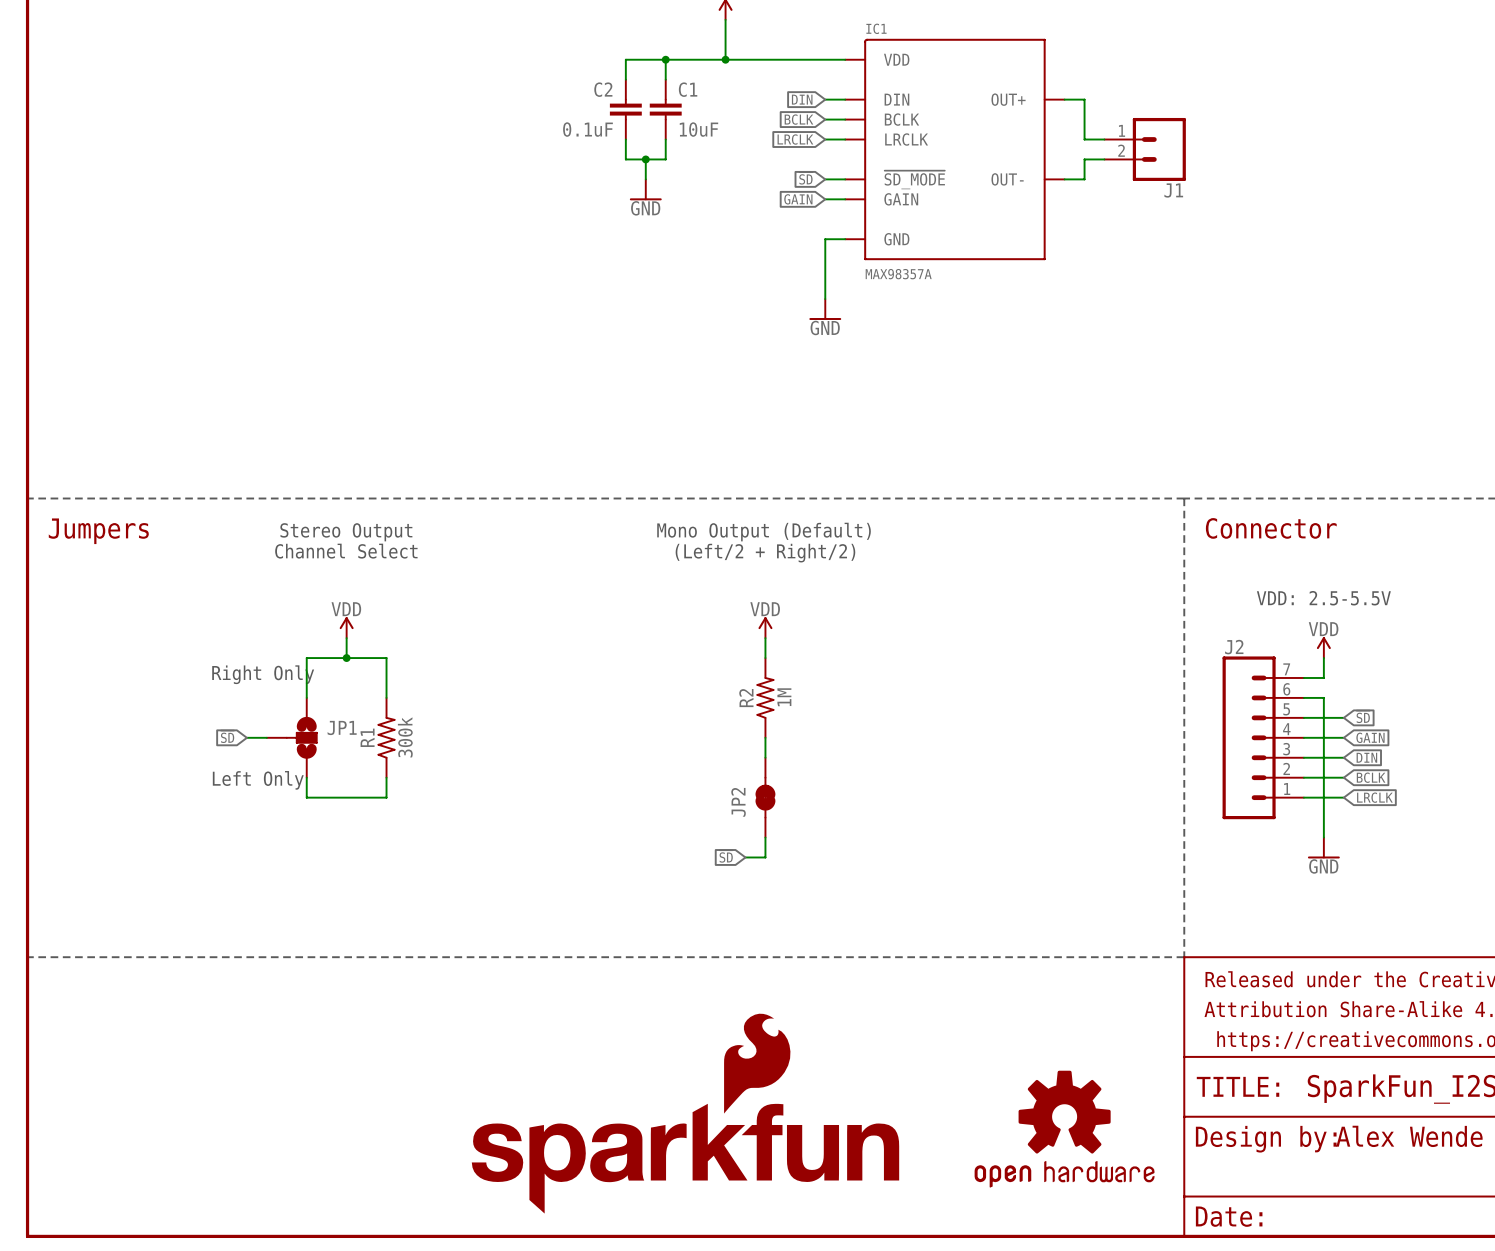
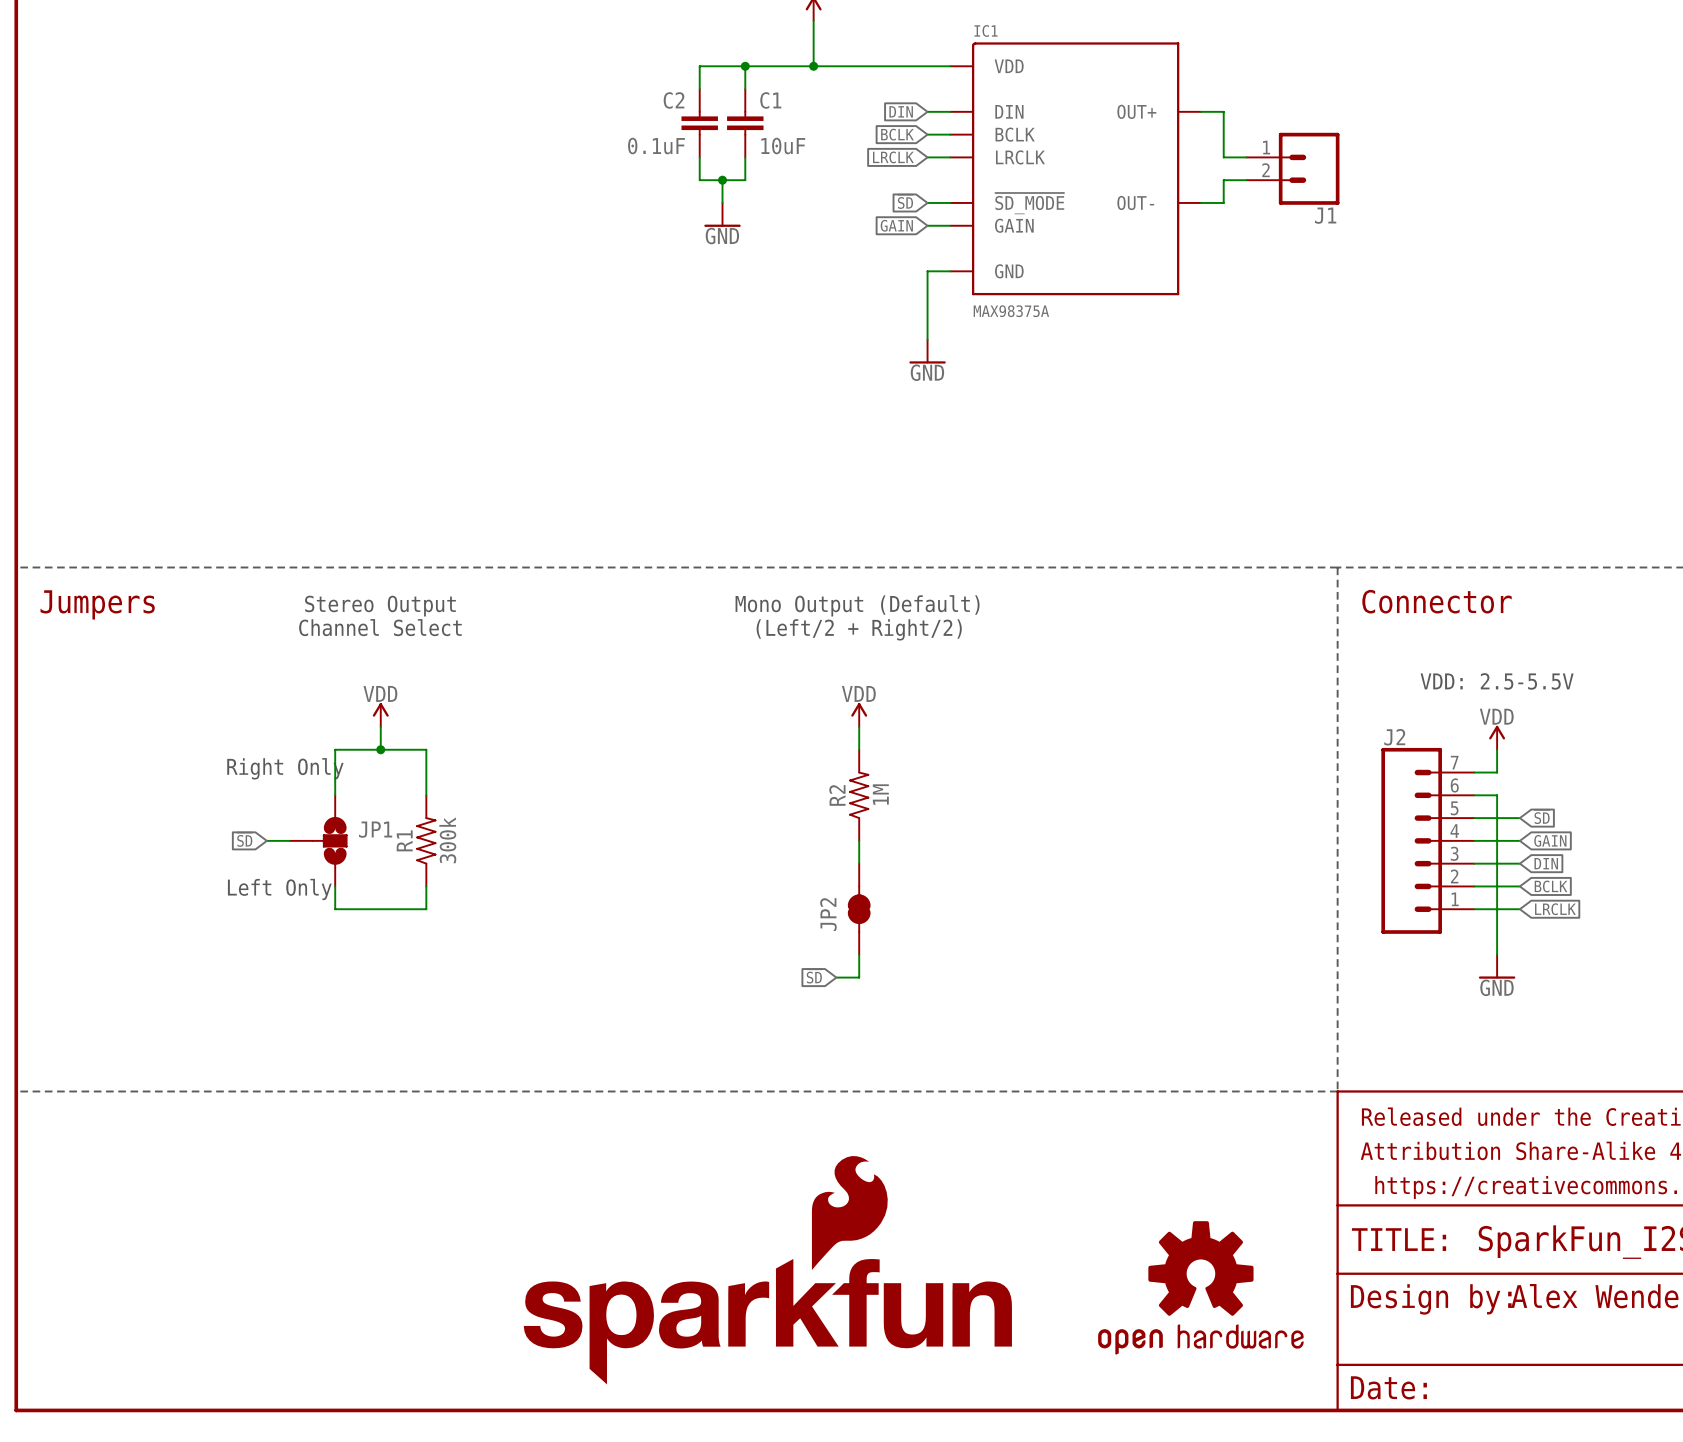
IC1 value: MAX98357A (898, 274) -> MAX98375A (1011, 311)

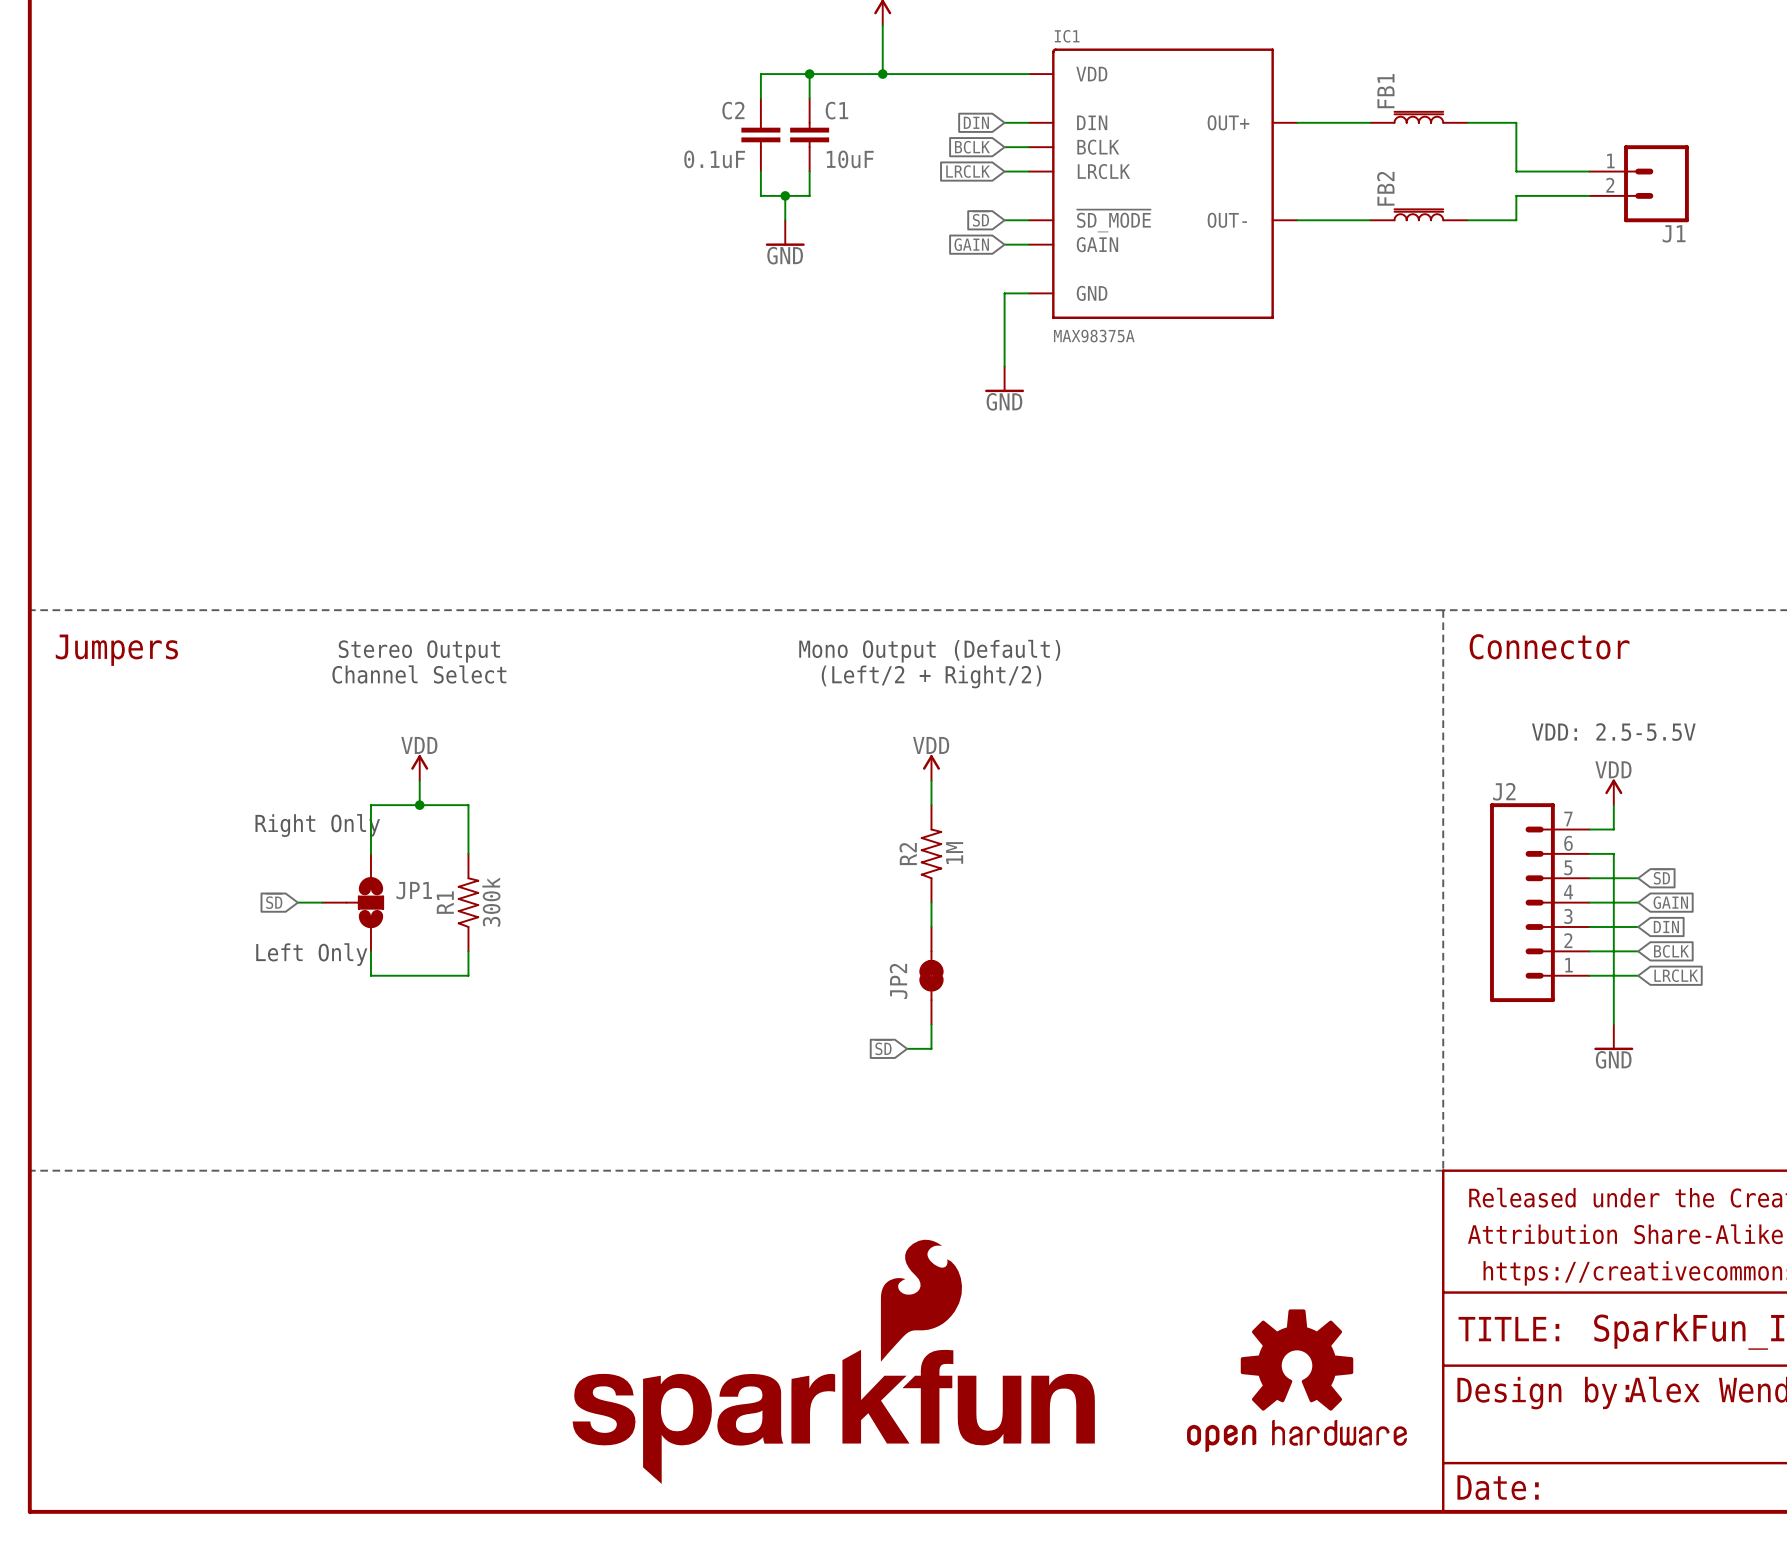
FB1: none -> (1418, 117)
wire: (1223, 111) (1223, 157) (1246, 157) -> (1321, 122) (1370, 122)
wire: none -> (1467, 122) (1516, 122) (1516, 171) (1589, 171)
J1 position: (1292, 168) -> (1639, 183)
wire: (1246, 180) (1223, 180) (1223, 202) -> (1370, 220) (1321, 220)
wire: none -> (1589, 195) (1516, 195) (1516, 220) (1467, 220)
FB2: none -> (1418, 214)

